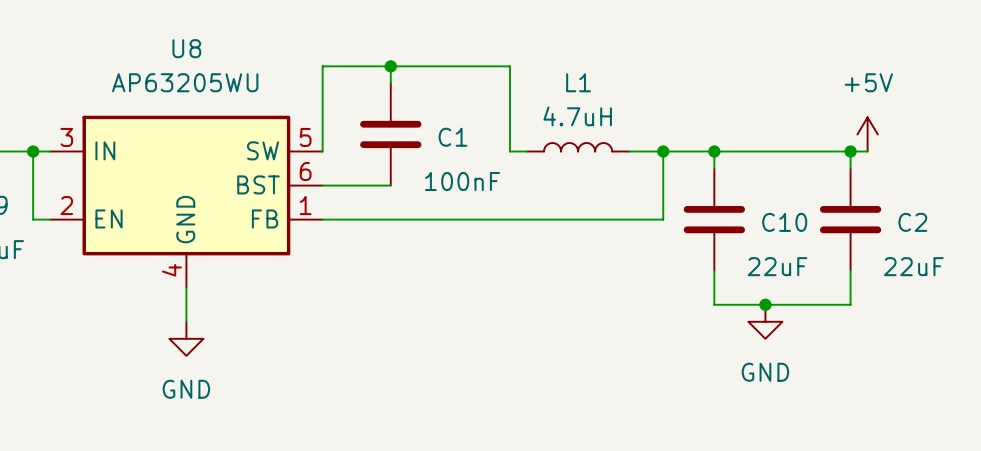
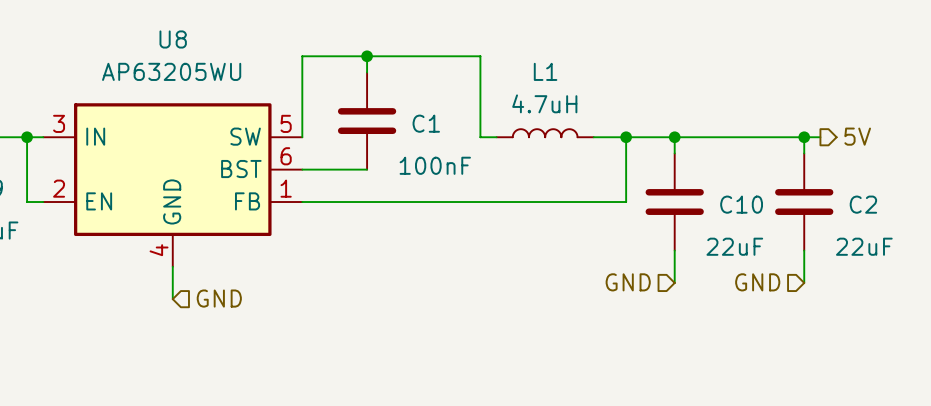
power symbol: +5V (867, 134) -> none
hierarchical label: none -> 5V (857, 136)
hierarchical label: none -> GND (628, 282)
wire: (714, 304) (850, 304) -> none
junction: (765, 304) -> none
hierarchical label: none -> GND (757, 282)
hierarchical label: none -> GND (219, 298)
power symbol: GND (765, 321) -> none
power symbol: GND (186, 338) -> none

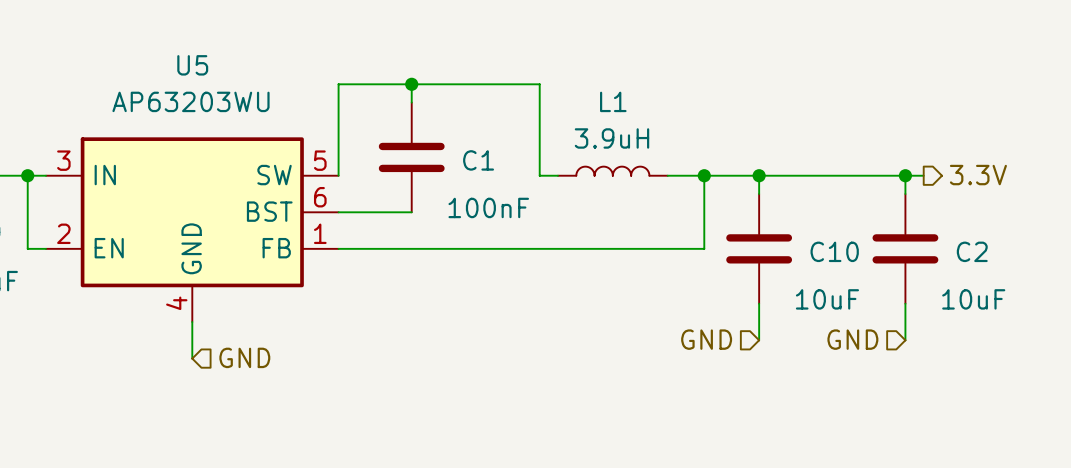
U8 name: U8 (173, 39) -> U5 (192, 65)
U8 value: AP63205WU (171, 71) -> AP63203WU (190, 101)
L1 value: 4.7uH (544, 103) -> 3.9uH (611, 138)
hierarchical label: 5V (857, 136) -> 3.3V (978, 175)
C10 value: 22uF (734, 246) -> 10uF (827, 299)
C2 value: 22uF (864, 246) -> 10uF (973, 299)

